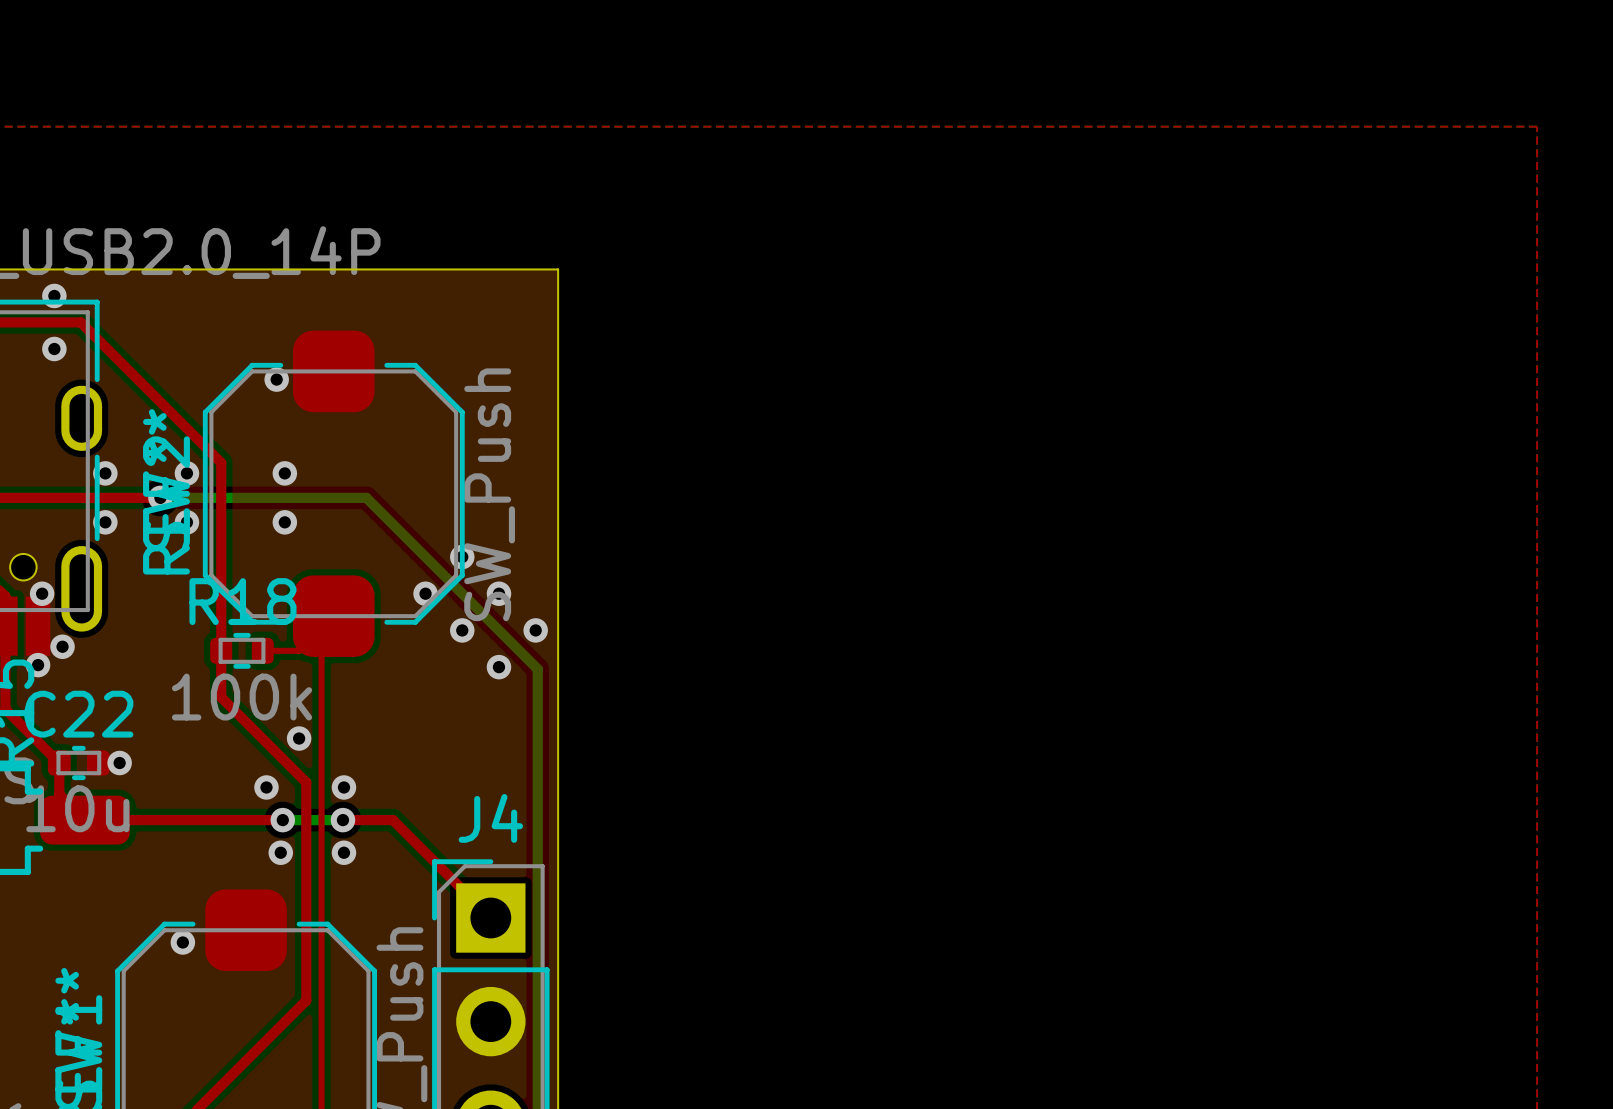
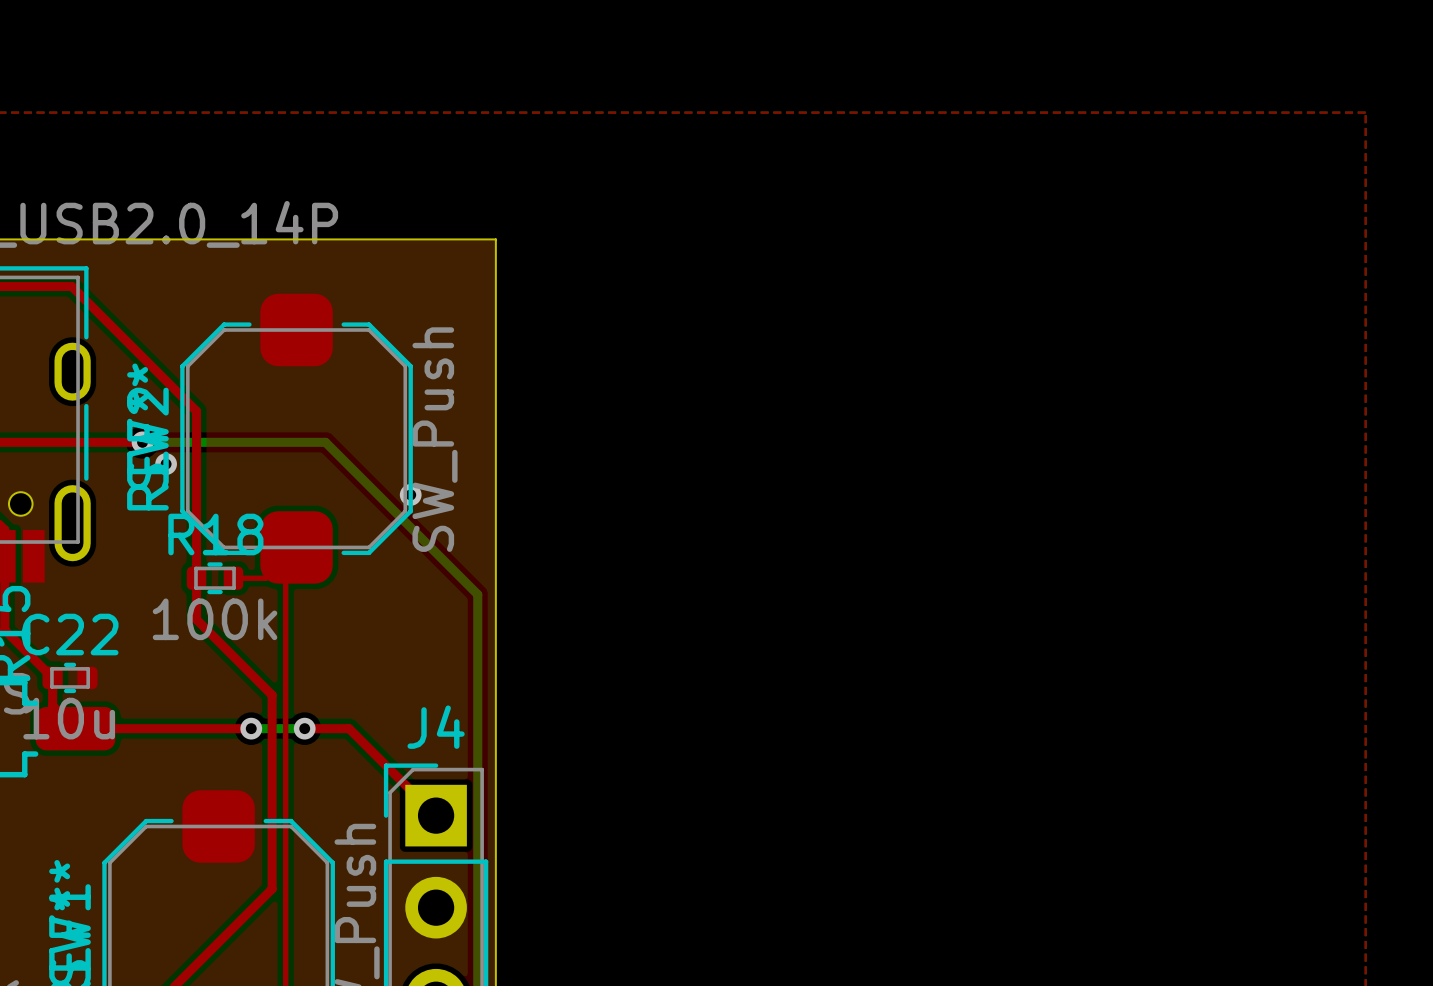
via: (54, 295) -> none
via: (54, 348) -> none
via: (276, 379) -> none
via: (105, 473) -> none
via: (186, 473) -> none
via: (284, 473) -> none
via: (105, 522) -> none
via: (284, 522) -> none
via: (42, 593) -> none
via: (425, 593) -> none
via: (498, 593) -> none
via: (462, 630) -> none
via: (535, 630) -> none
via: (62, 646) -> none
via: (38, 665) -> none
via: (498, 667) -> none
via: (299, 738) -> none
via: (119, 763) -> none
via: (266, 787) -> none
via: (343, 787) -> none
via: (280, 852) -> none
via: (343, 852) -> none
via: (182, 942) -> none

